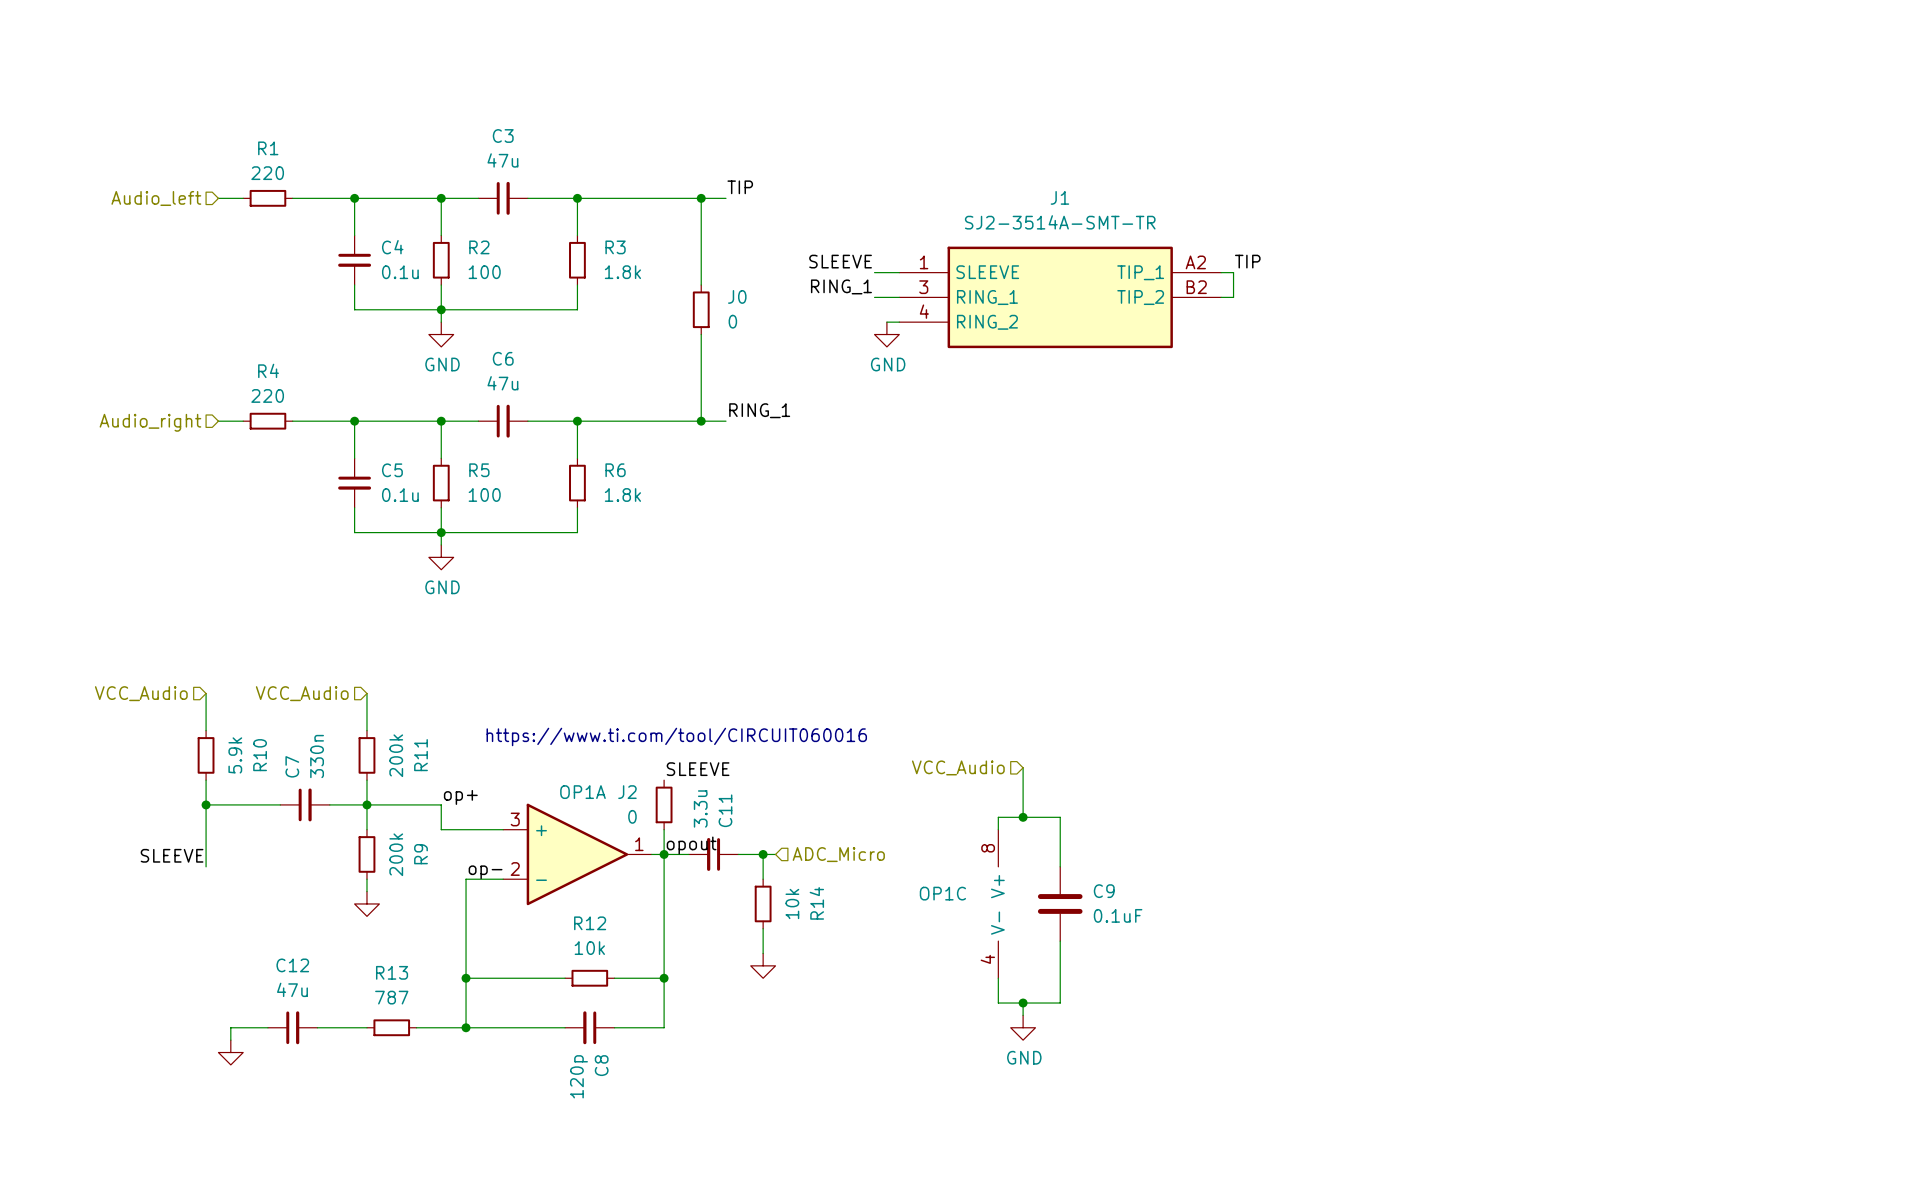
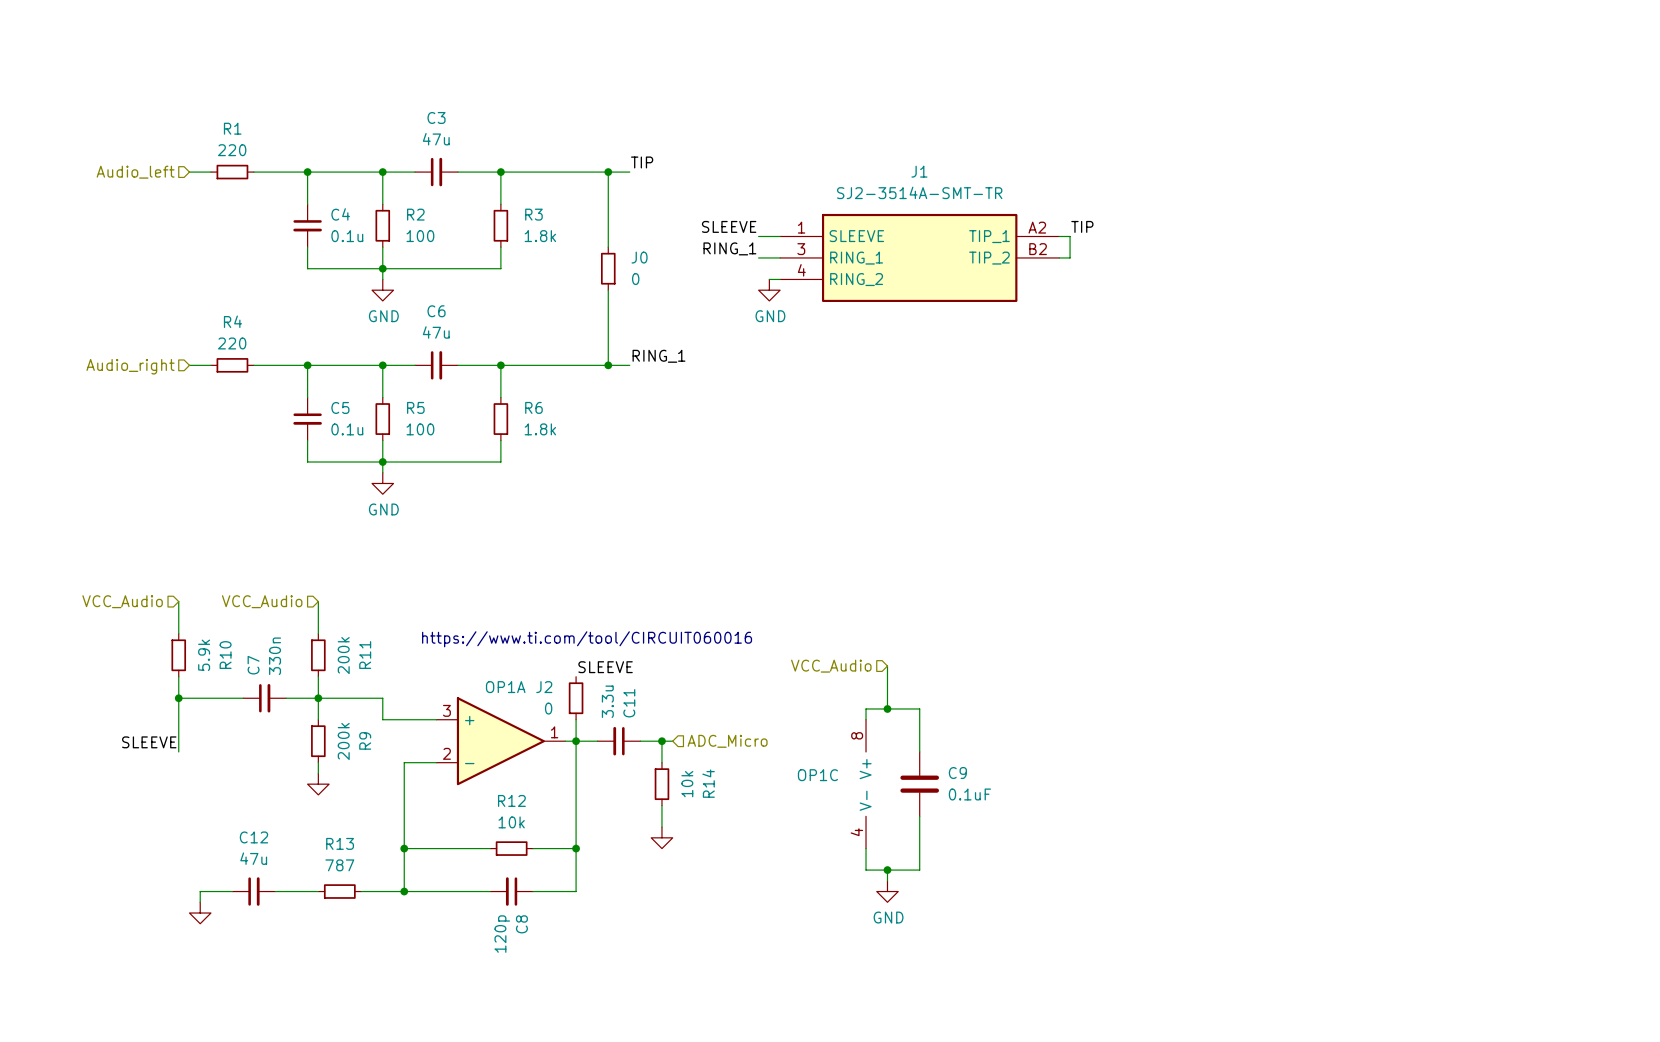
label: op+ (460, 797) -> none
label: opout (691, 845) -> none
label: op- (485, 872) -> none

